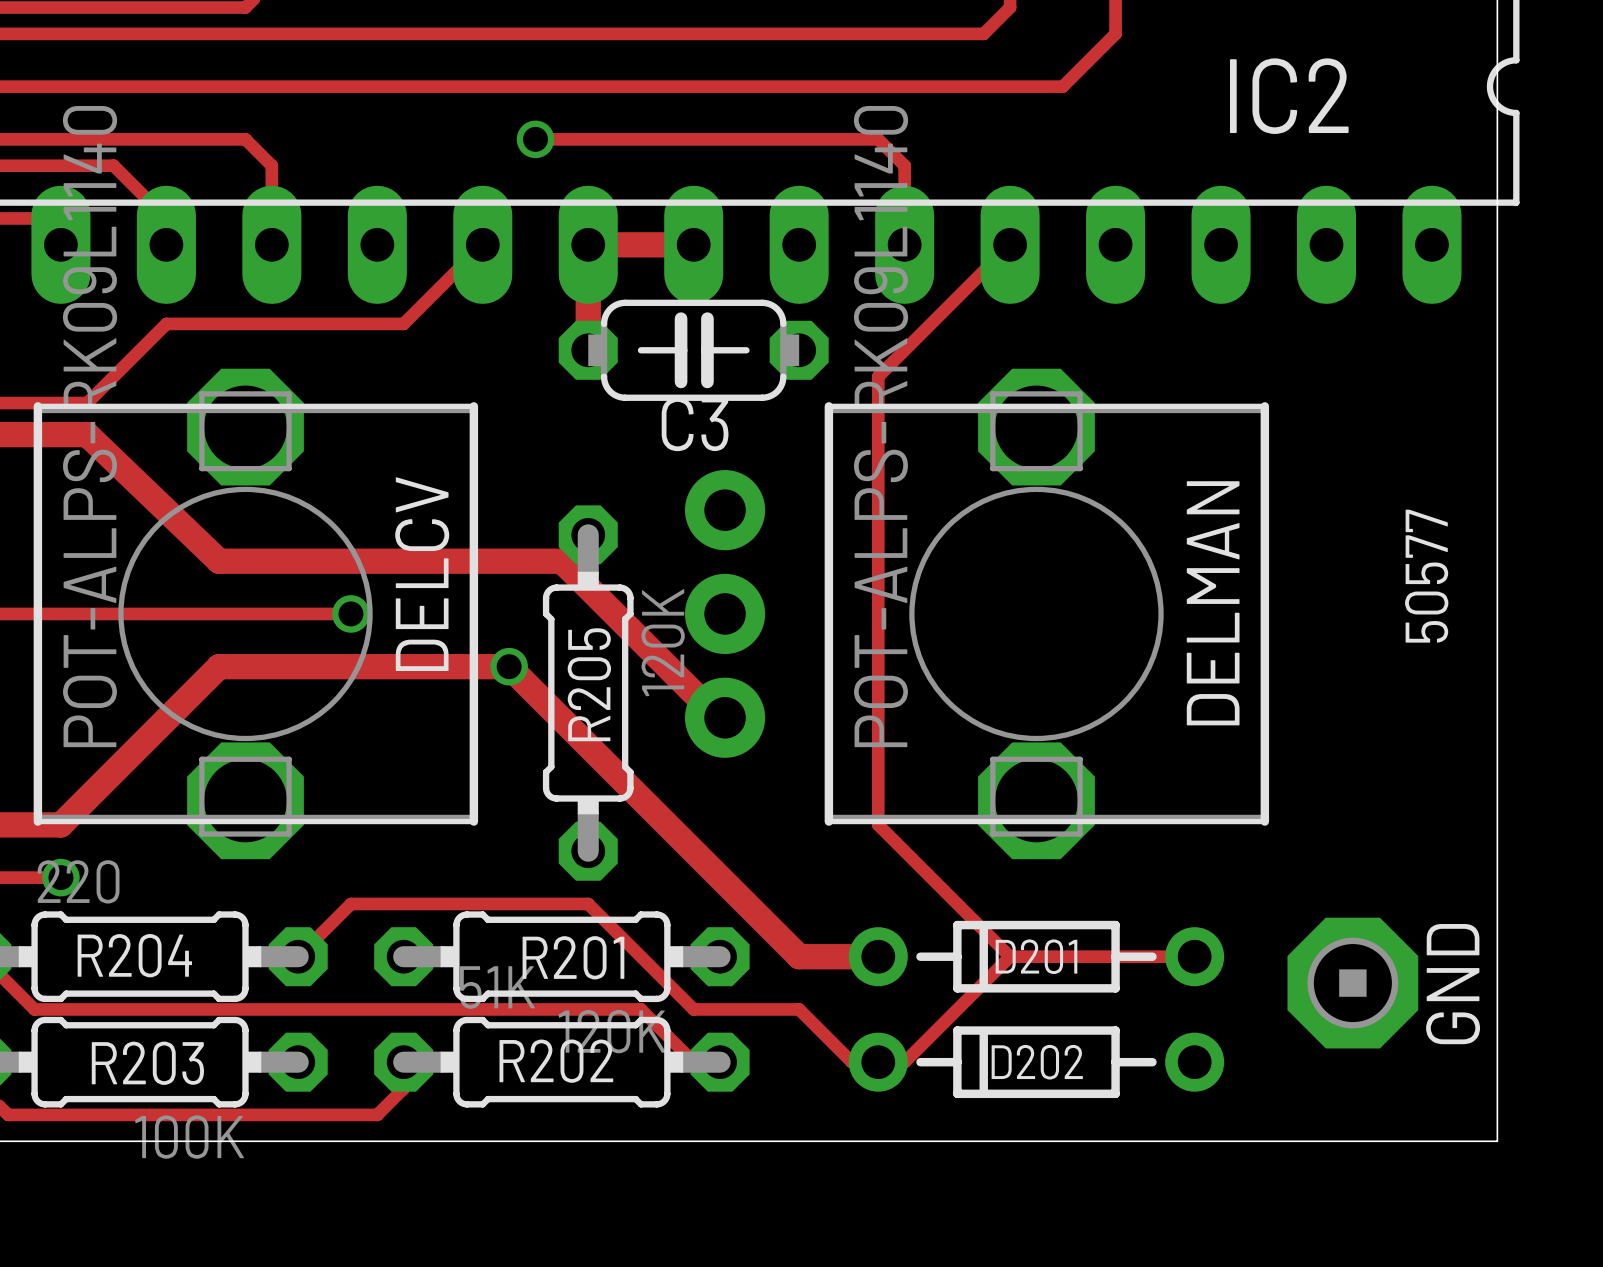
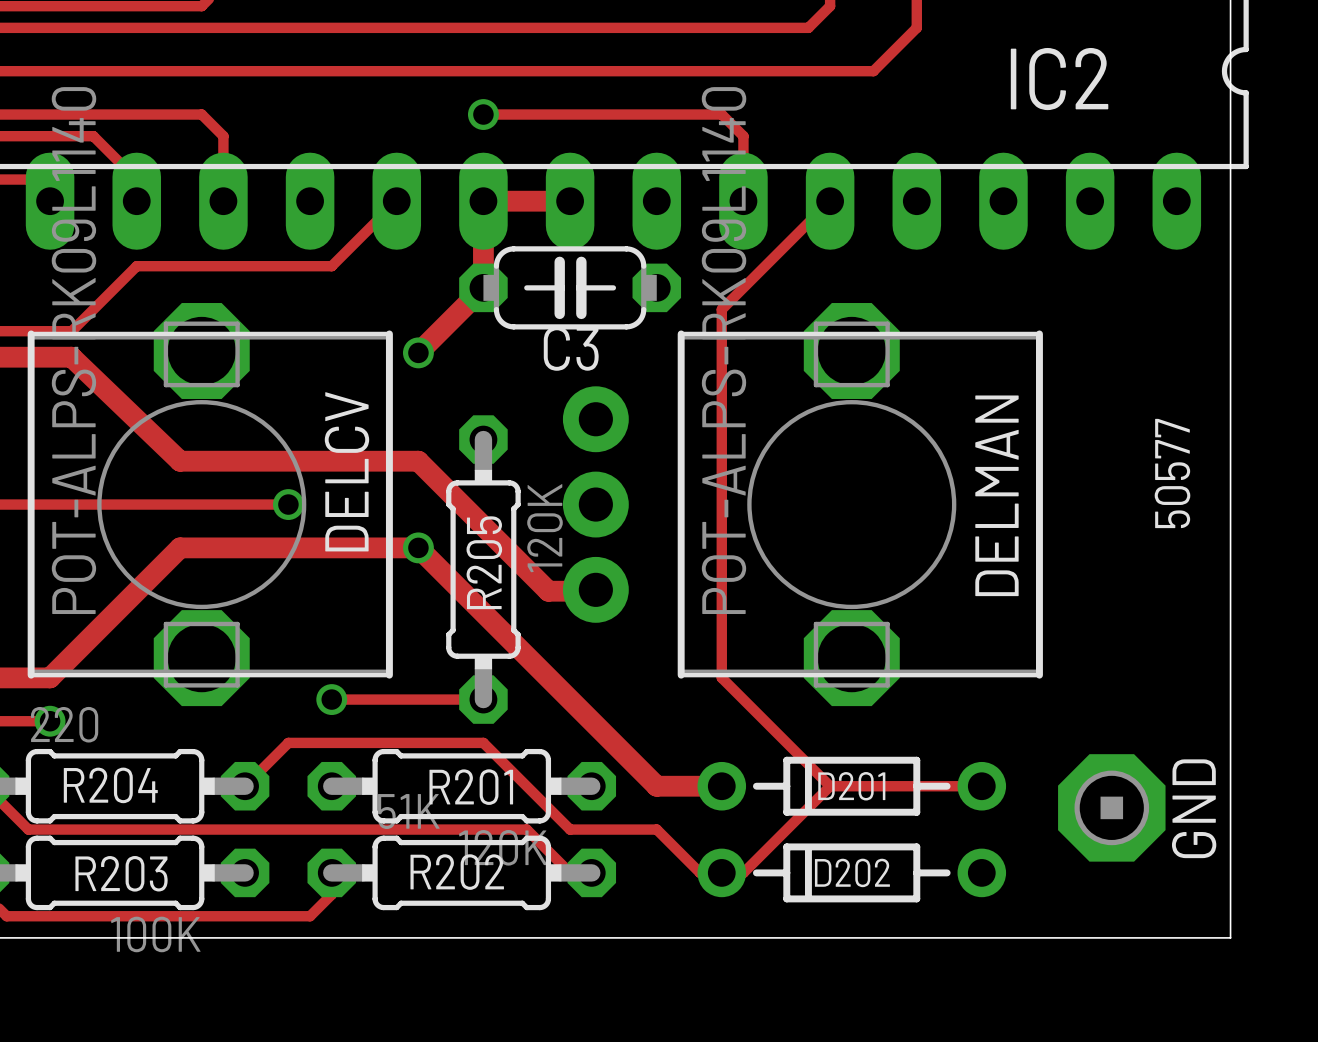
track: (535, 139) (588, 139) -> none
via position: (535, 139) -> (483, 114)
track: none -> (483, 287) (418, 352)
via: none -> (418, 352)
track: (509, 561) (561, 561) (720, 719) -> (418, 461) (548, 591) (591, 591)
track: none -> (331, 699) (483, 699)
via: none -> (331, 699)

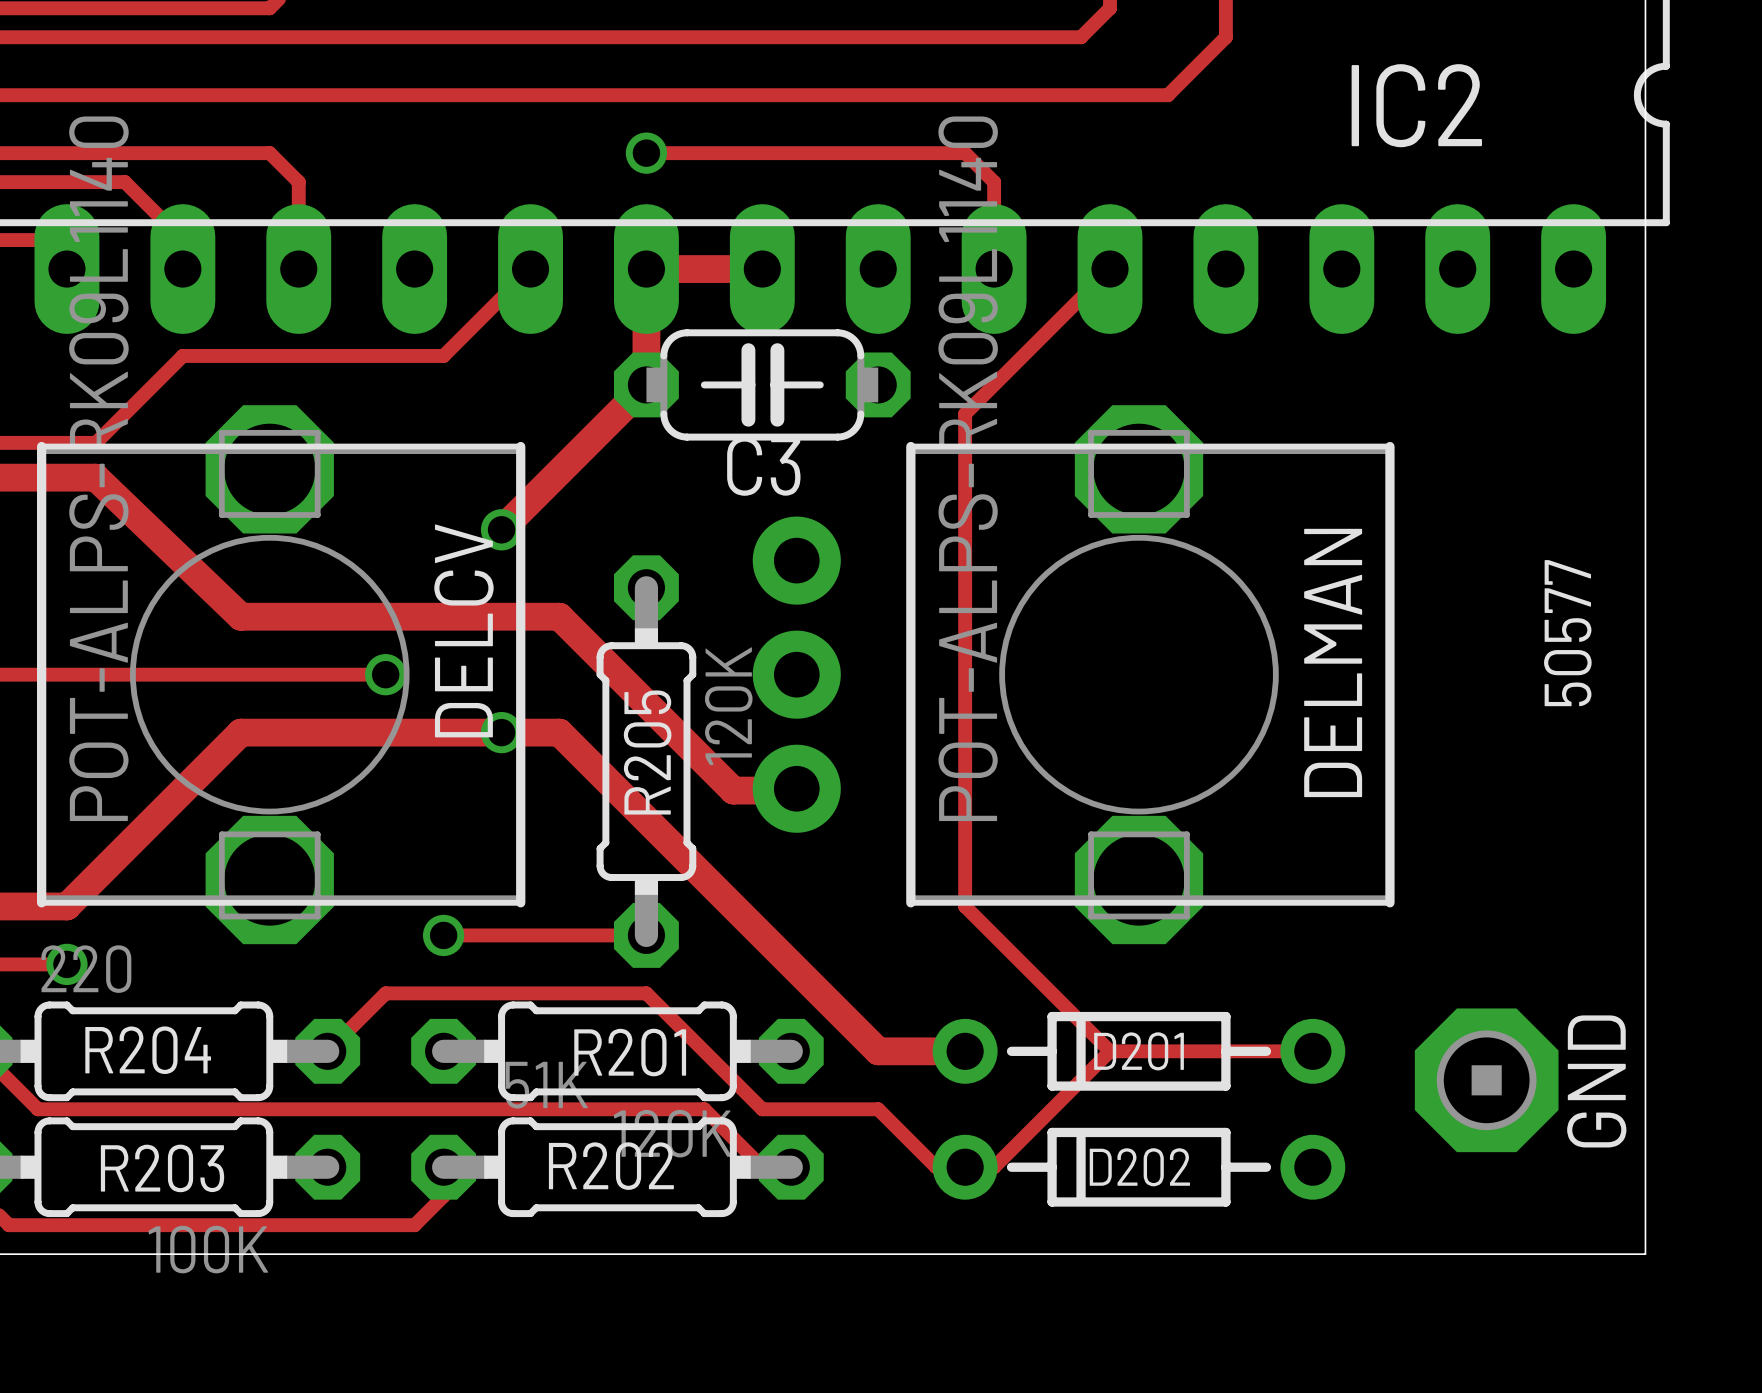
track: none -> (559, 471) (501, 529)
via position: (418, 352) -> (501, 529)
via position: (418, 547) -> (501, 732)

